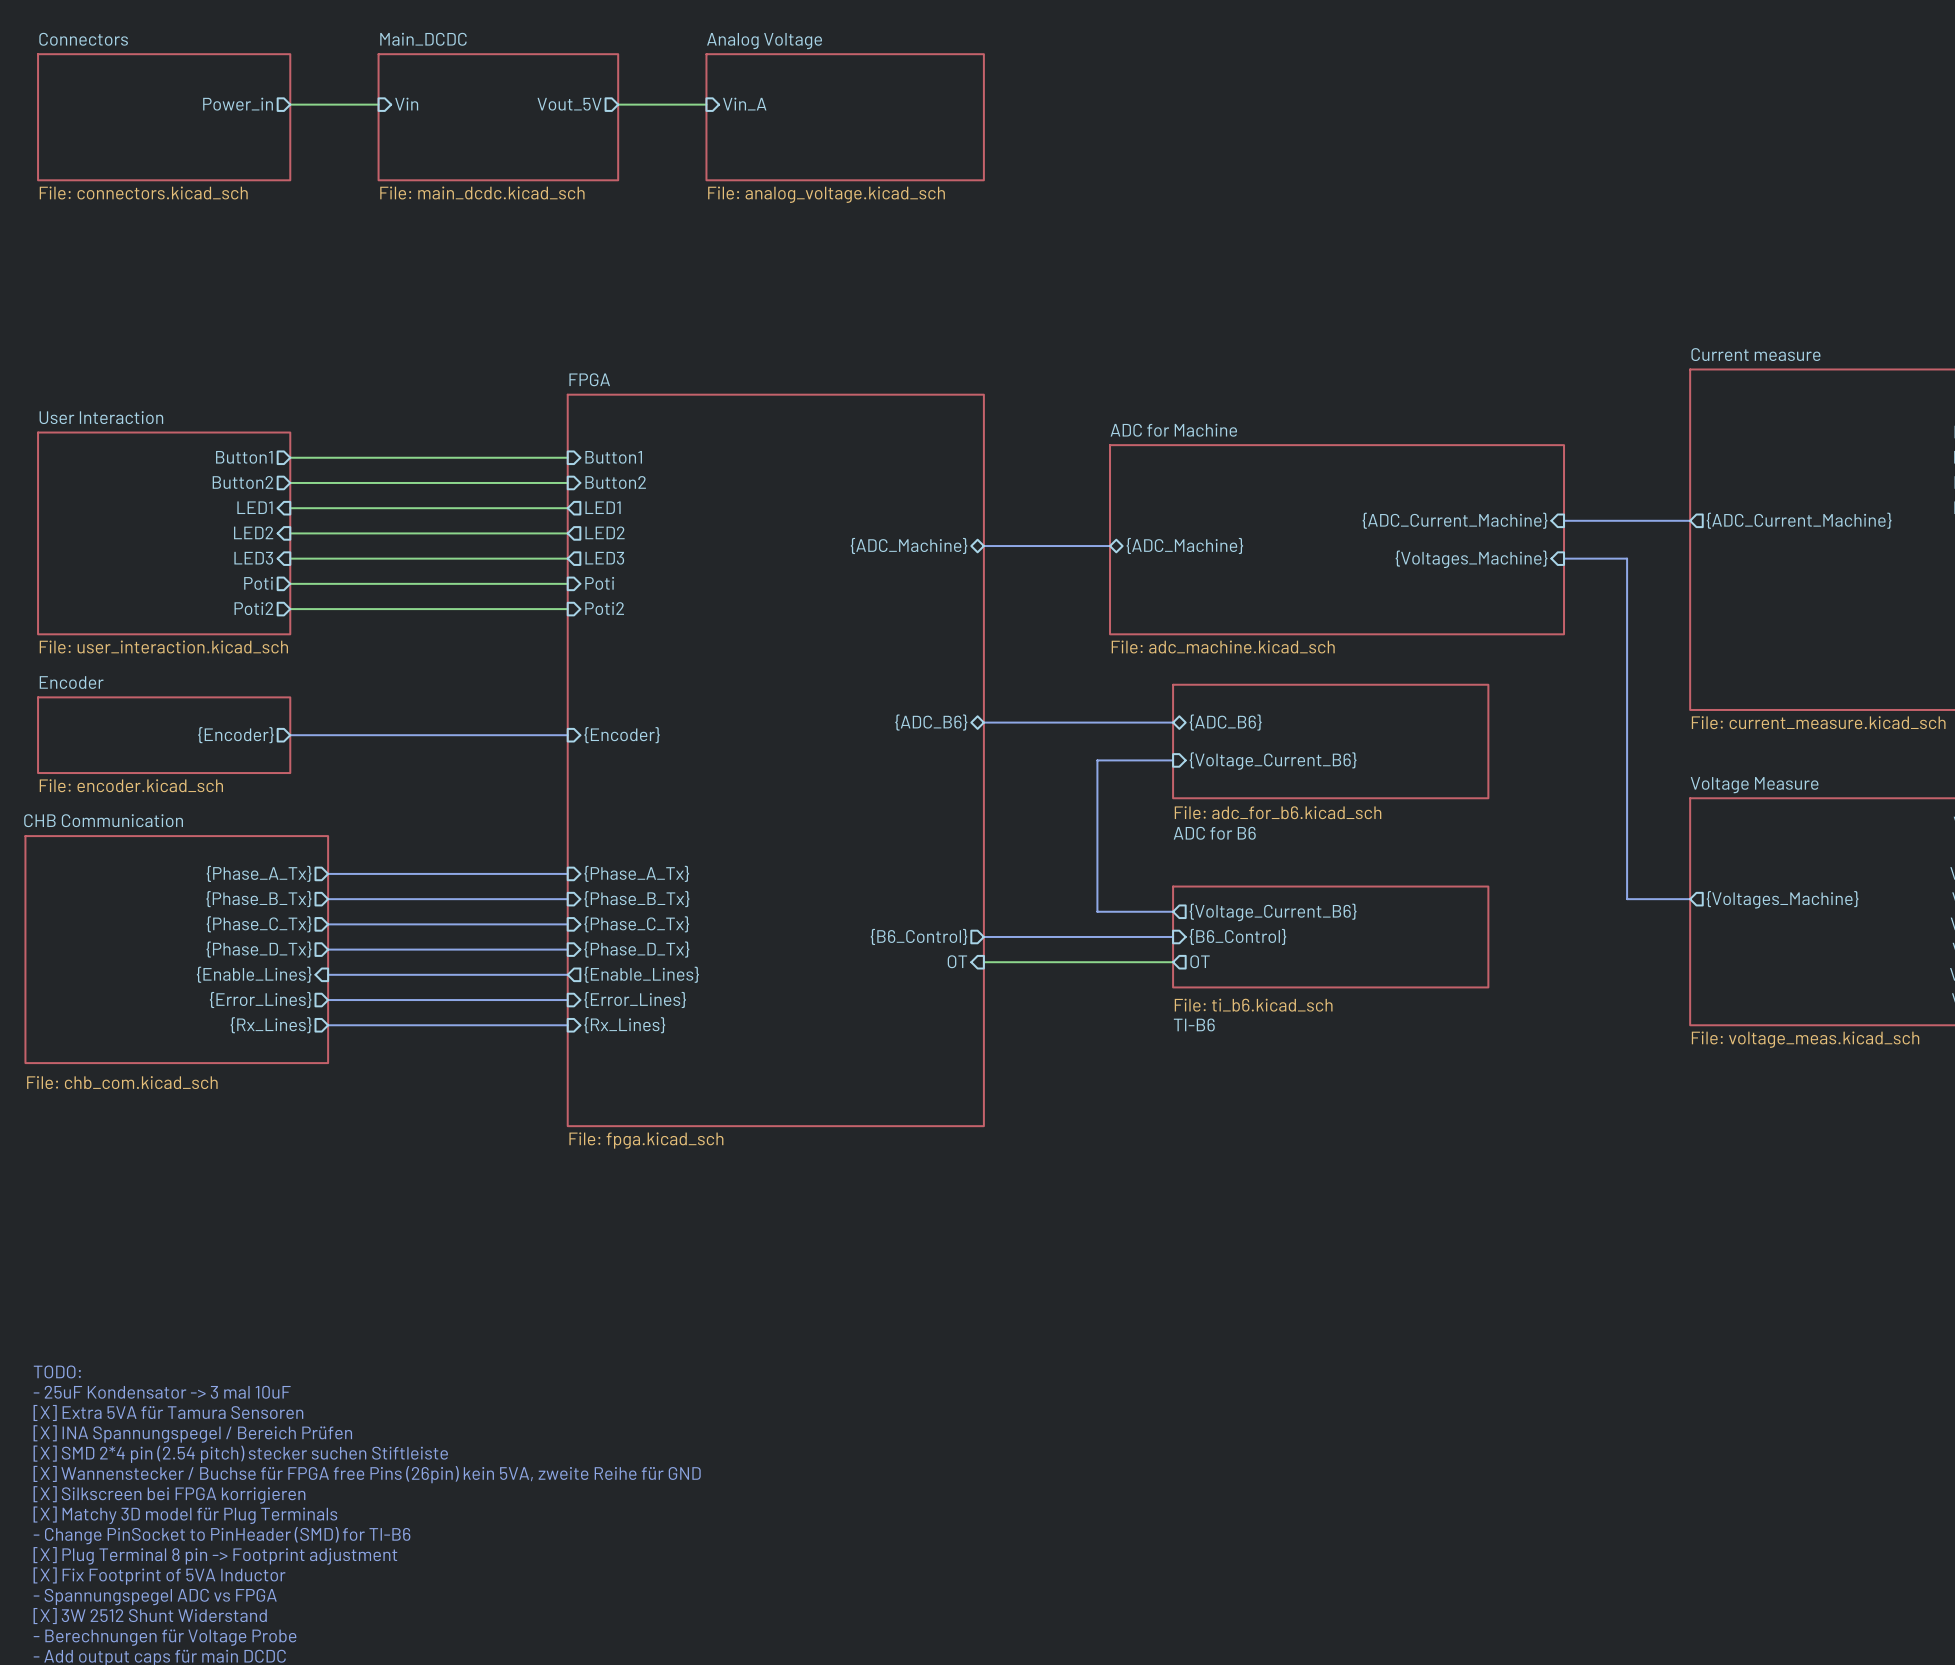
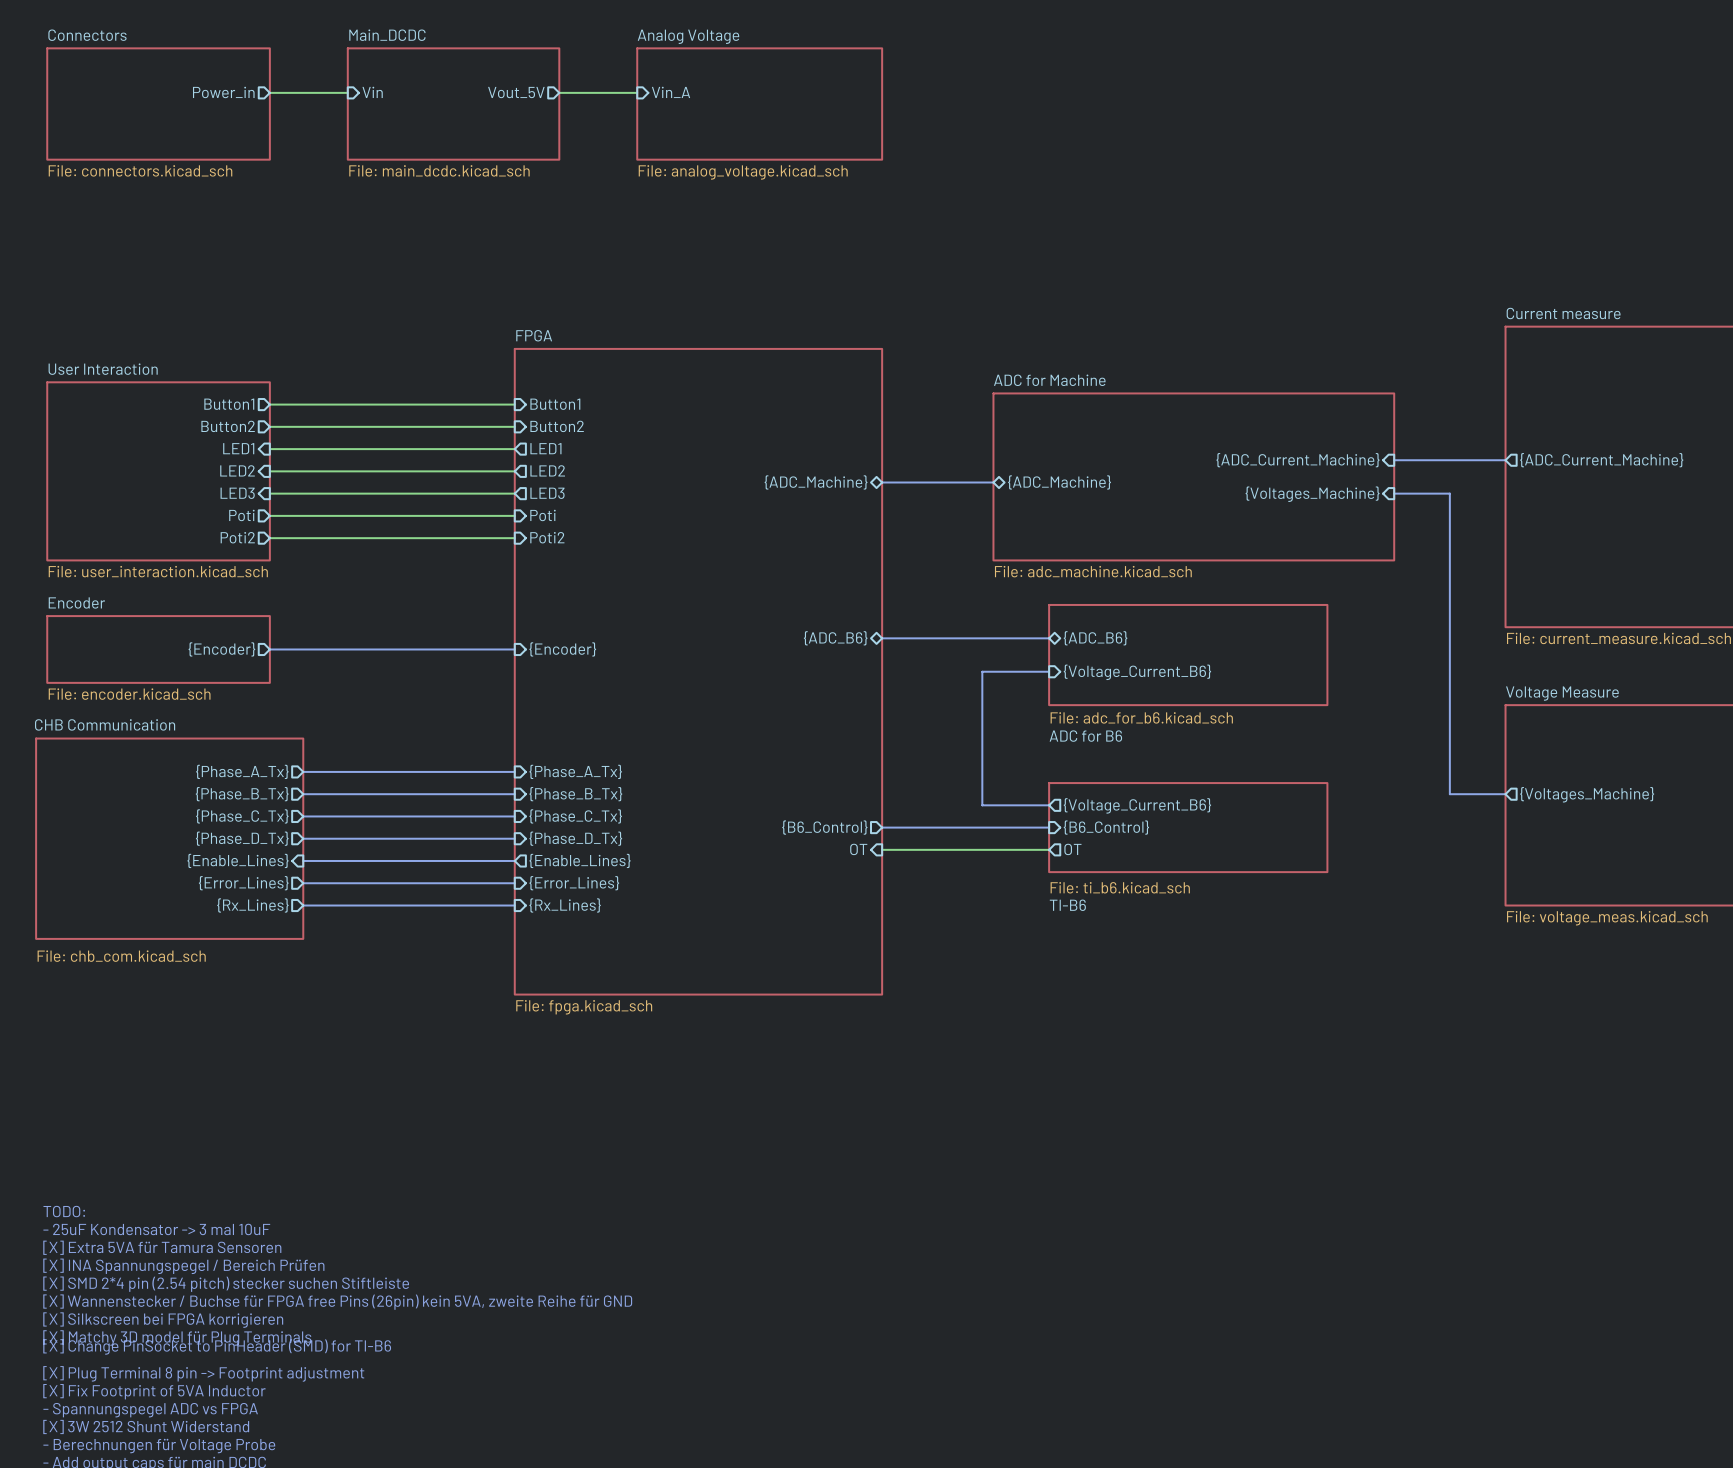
text: - Change PinSocket to PinHeader (SMD) for TI-B6 (222, 1535) -> [X] Change PinSocket to PinHeader (SMD) for TI-B6 (217, 1346)

